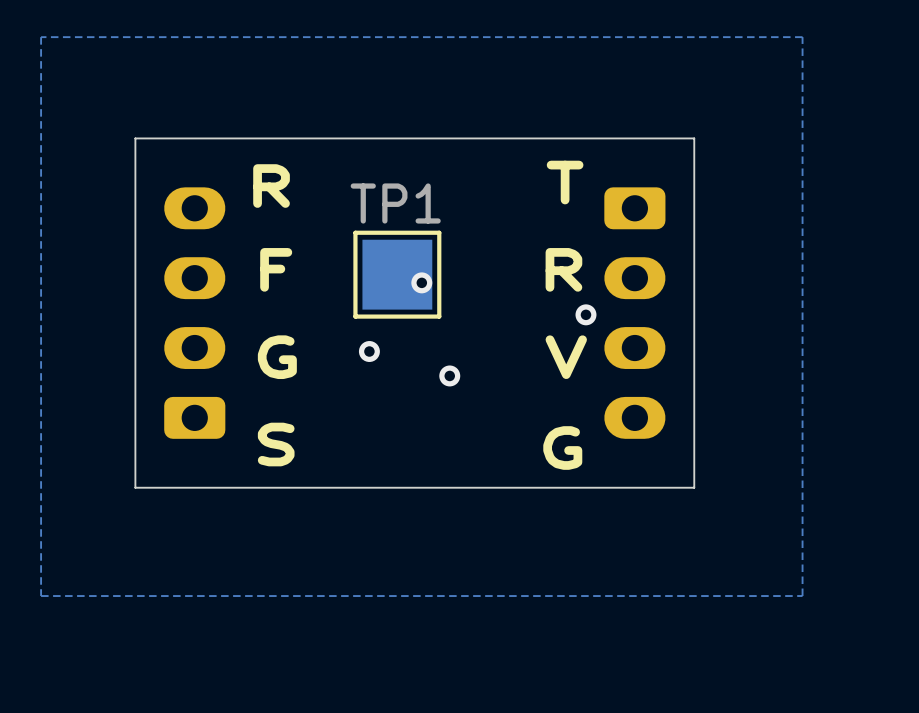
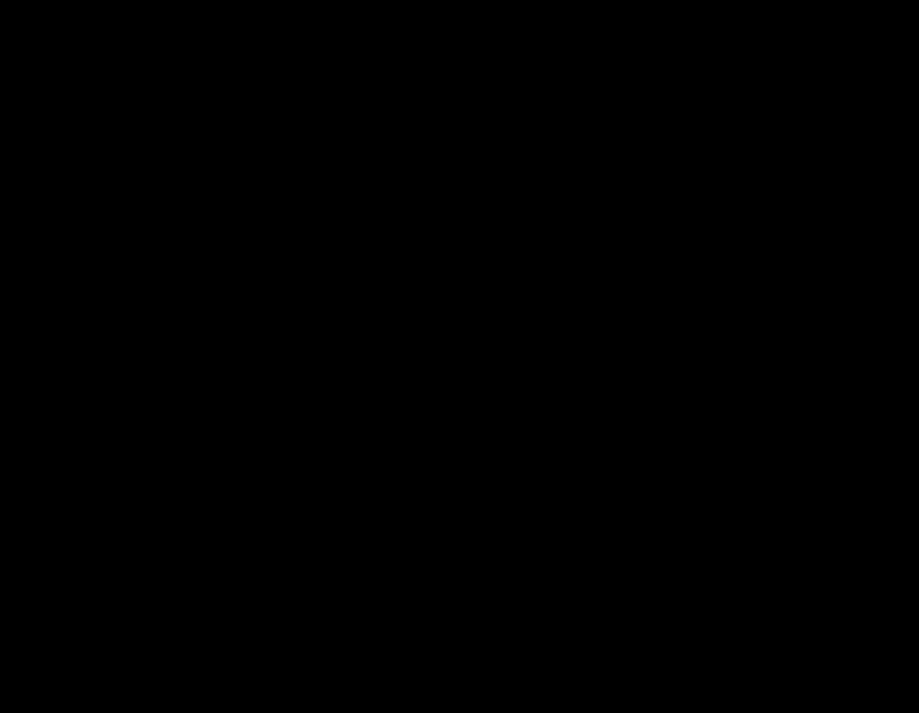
zone outline: (802, 37) (802, 596) (41, 596) (41, 37) (802, 37) -> none
board edge: (694, 138) (135, 138) (135, 487) (694, 487) (694, 138) -> none
text: T (565, 182) -> none
text: R (271, 186) -> none
text: F (276, 269) -> none
text: R (563, 269) -> none
TP1: (397, 274) -> none
via: (421, 282) -> none
part: (194, 313) -> none
part: (634, 313) -> none
via: (585, 314) -> none
via: (369, 351) -> none
text: G (277, 357) -> none
text: V (566, 357) -> none
via: (449, 375) -> none
text: S (276, 444) -> none
text: G (562, 448) -> none

